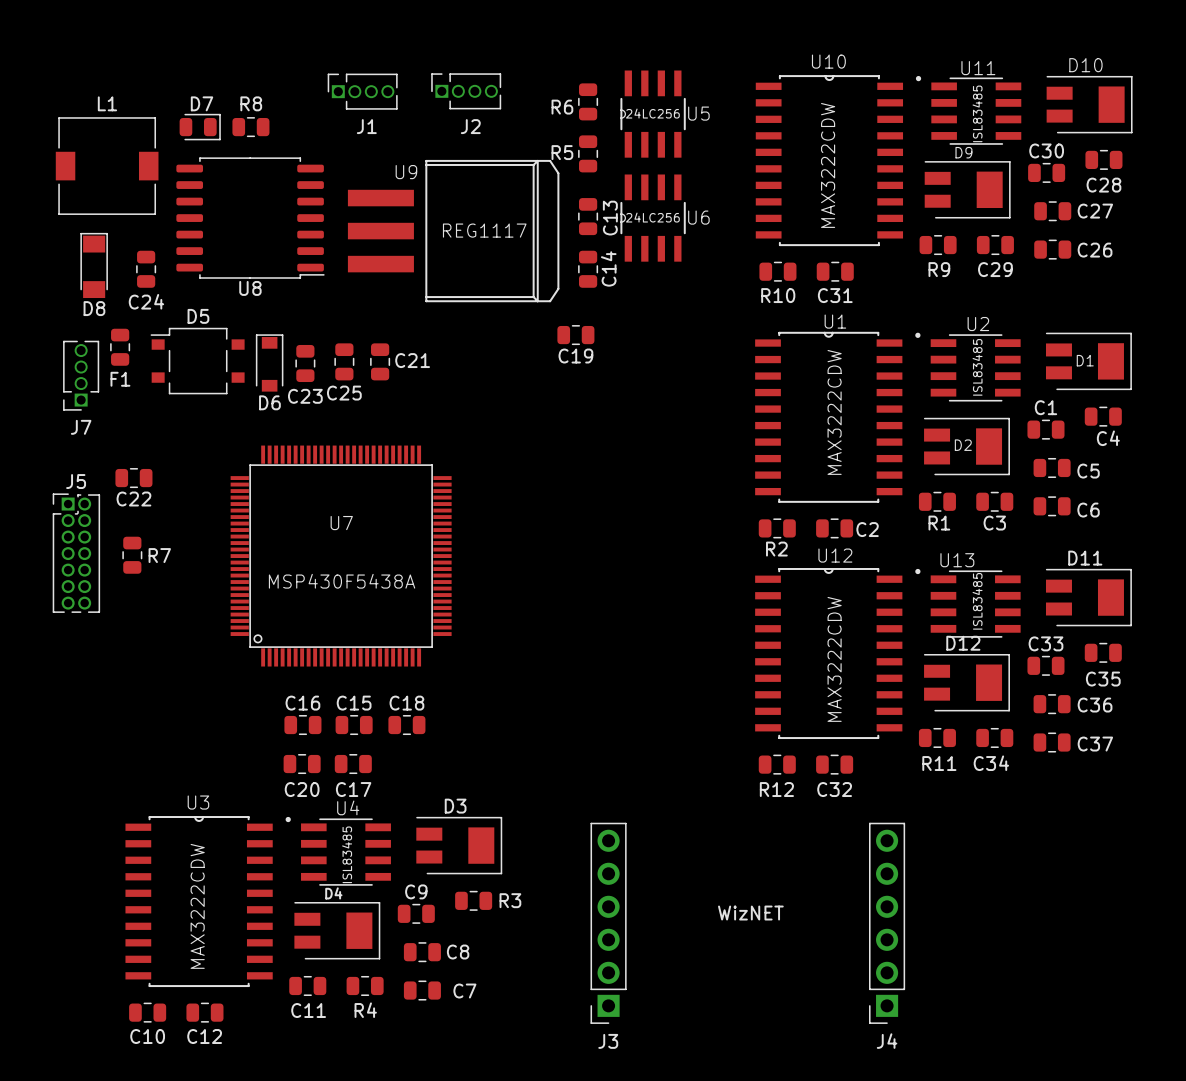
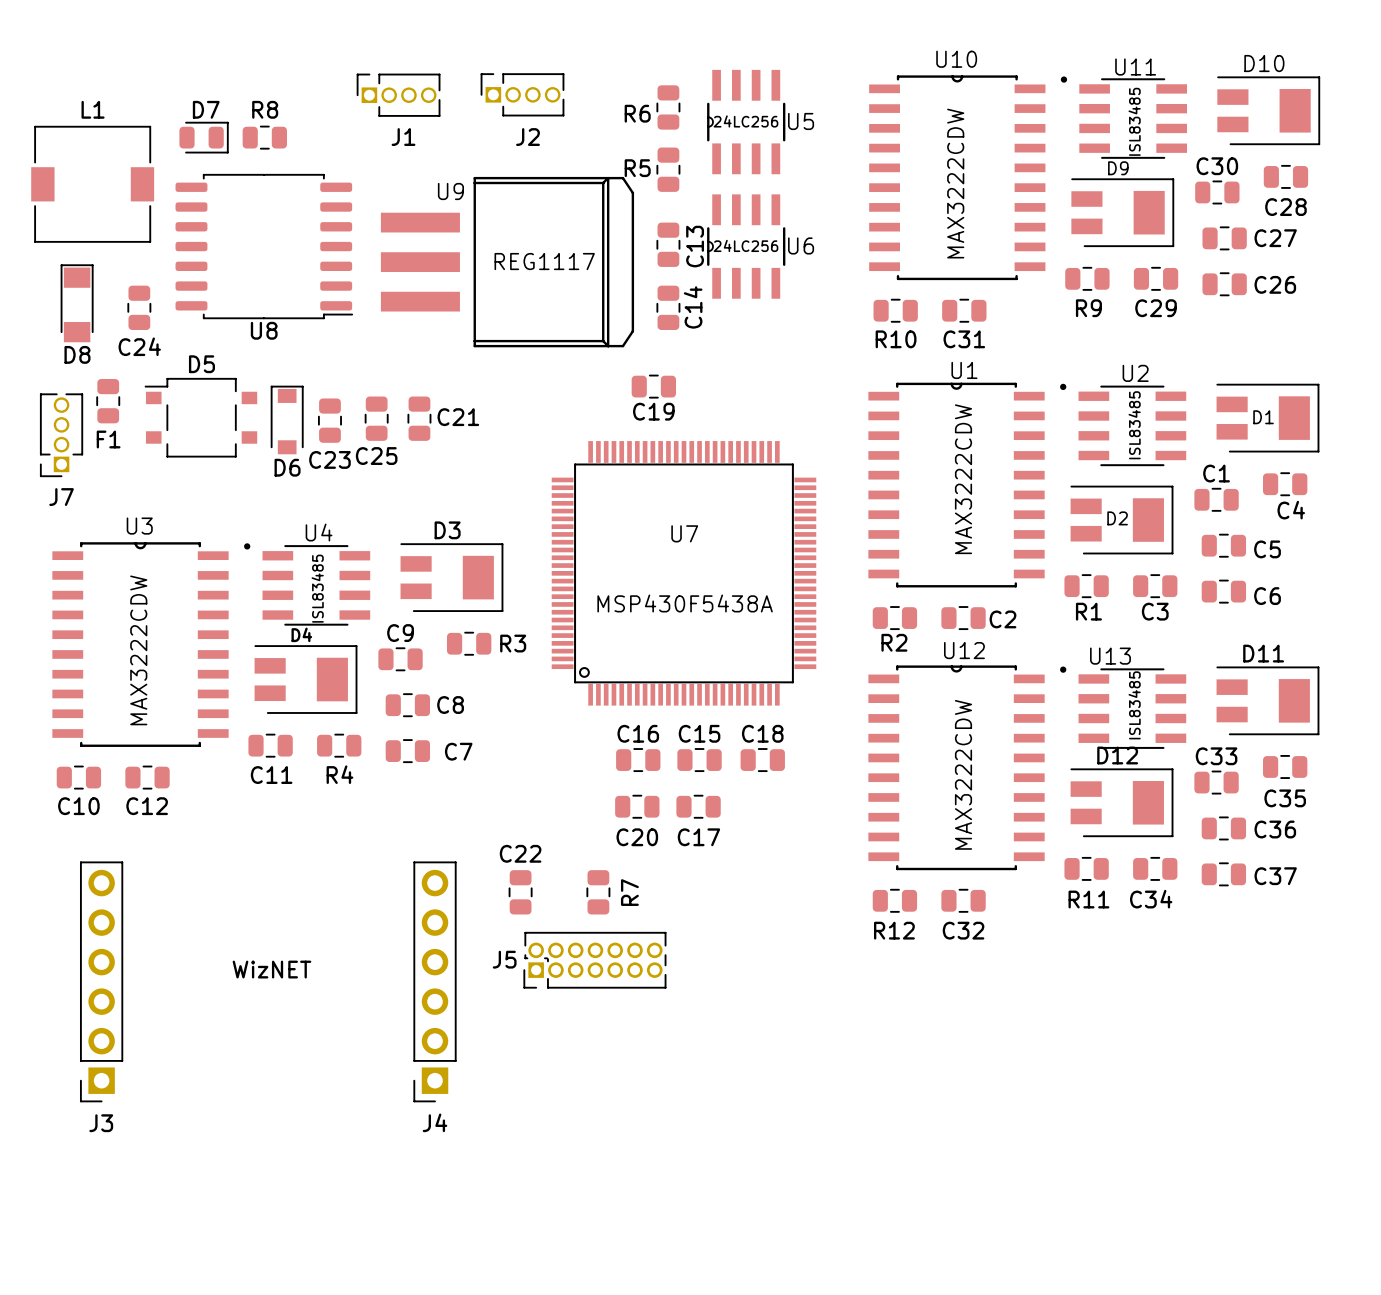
C22 rotation: 0° (133, 478) -> 90° clockwise (520, 892)
C22 position: (133, 478) -> (520, 892)
C22 name position: C22 (133, 499) -> C22 (520, 853)
J5 rotation: 0° (76, 553) -> 90° counterclockwise (594, 960)
J5 position: (76, 553) -> (594, 960)
R7 position: (132, 555) -> (598, 892)
R7 name rotation: 0° (159, 555) -> 90° counterclockwise (629, 892)
U7 position: (341, 556) -> (683, 573)
C16 position: (302, 725) -> (638, 760)
C15 position: (354, 725) -> (699, 760)
C18 position: (406, 725) -> (762, 760)
C20 position: (302, 764) -> (637, 806)
C17 position: (353, 764) -> (698, 806)
text: none -> WizNET (271, 969)
D3 position: (459, 845) -> (451, 577)
U4 position: (338, 851) -> (307, 584)
R3 position: (473, 900) -> (469, 643)
U3 position: (199, 901) -> (140, 644)
C9 position: (416, 913) -> (400, 659)
text: WizNET (750, 913) -> none
J3 position: (608, 923) -> (101, 981)
J4 position: (887, 923) -> (435, 981)
D4 position: (337, 930) -> (305, 679)
C8 position: (422, 952) -> (407, 705)
C11 position: (307, 985) -> (270, 745)
R4 position: (365, 985) -> (339, 745)
C7 position: (422, 990) -> (407, 751)
C10 position: (147, 1012) -> (78, 777)
C12 position: (204, 1012) -> (147, 777)

